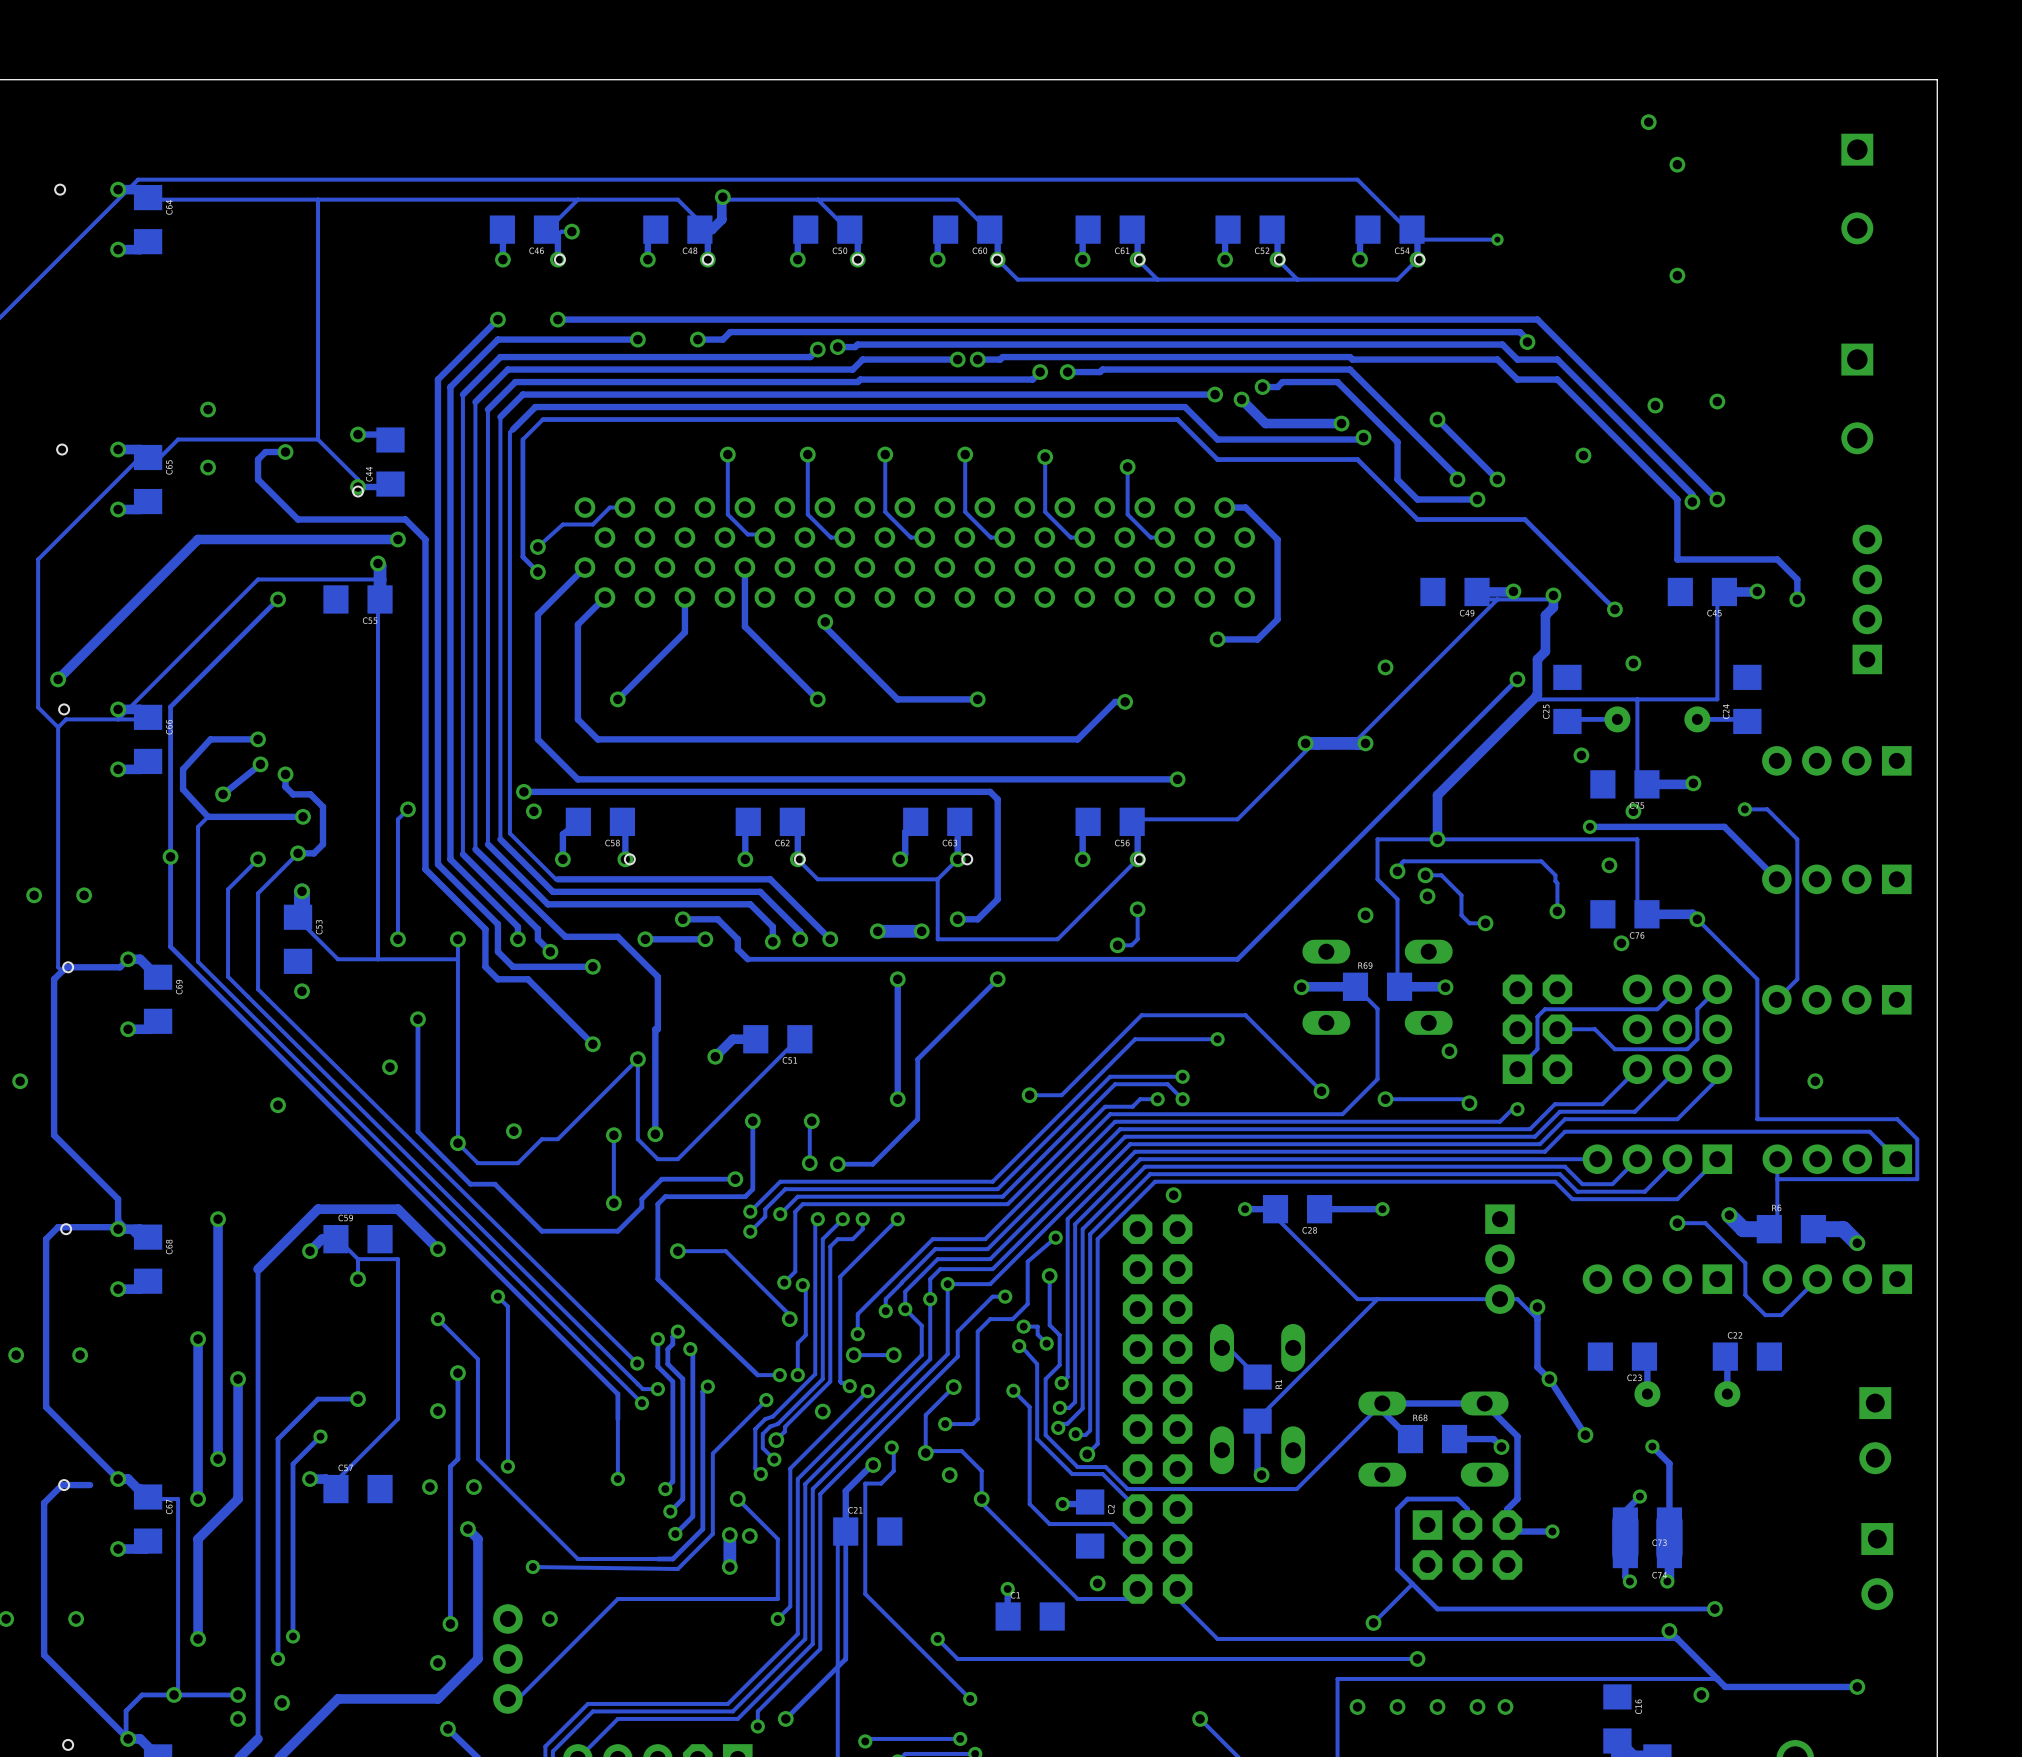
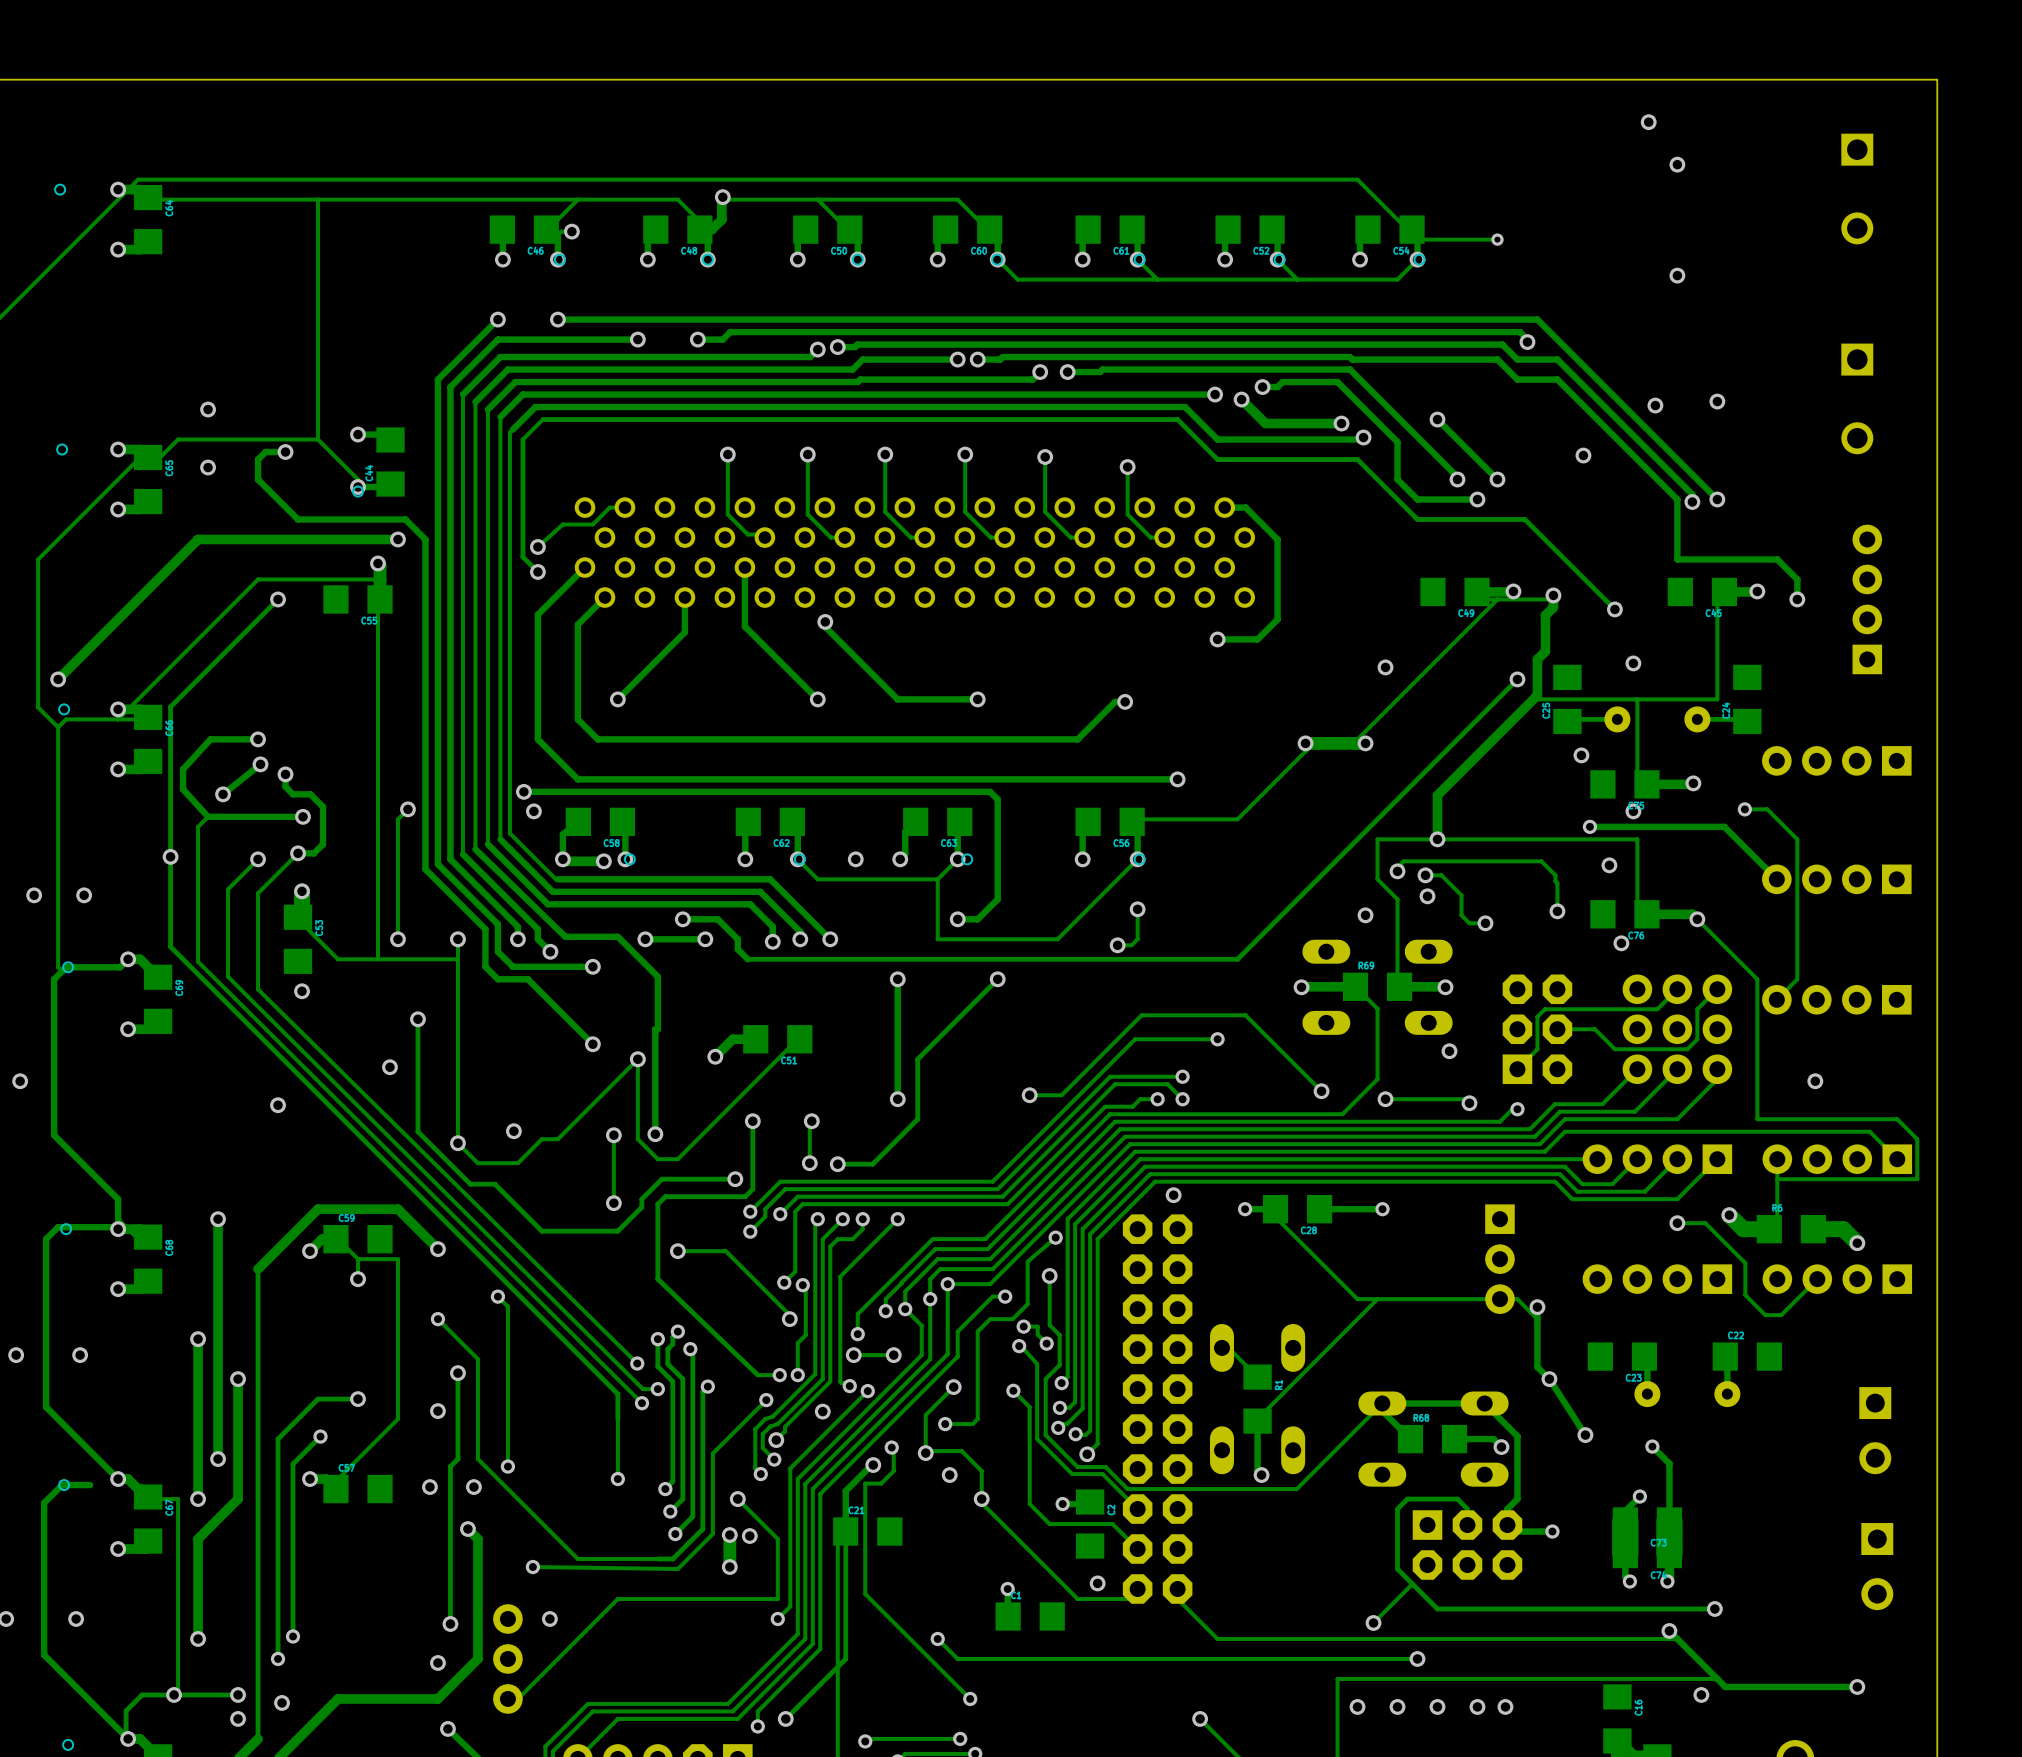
track: none -> (561, 859) (563, 861) (603, 861)
via: none -> (855, 859)
via: none -> (603, 861)
via: (877, 931) -> none
track: (921, 931) (877, 931) -> none
via: (921, 931) -> none

